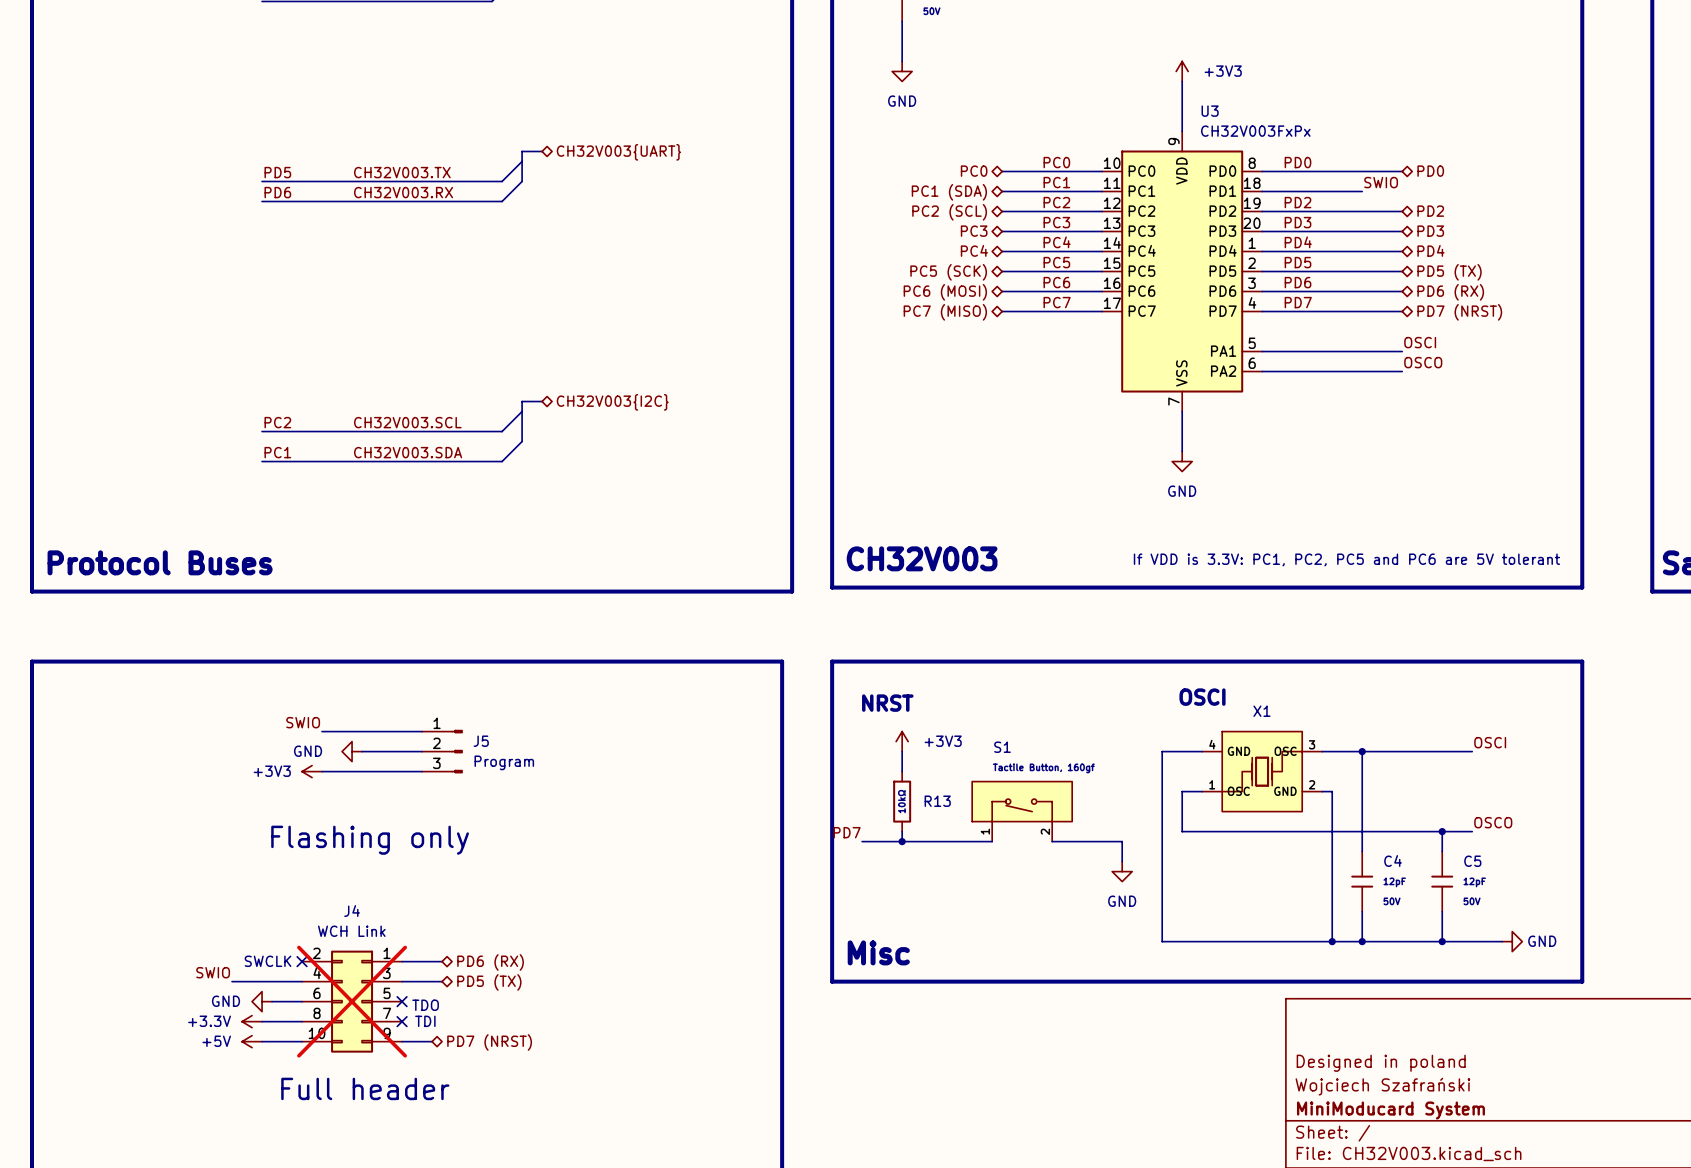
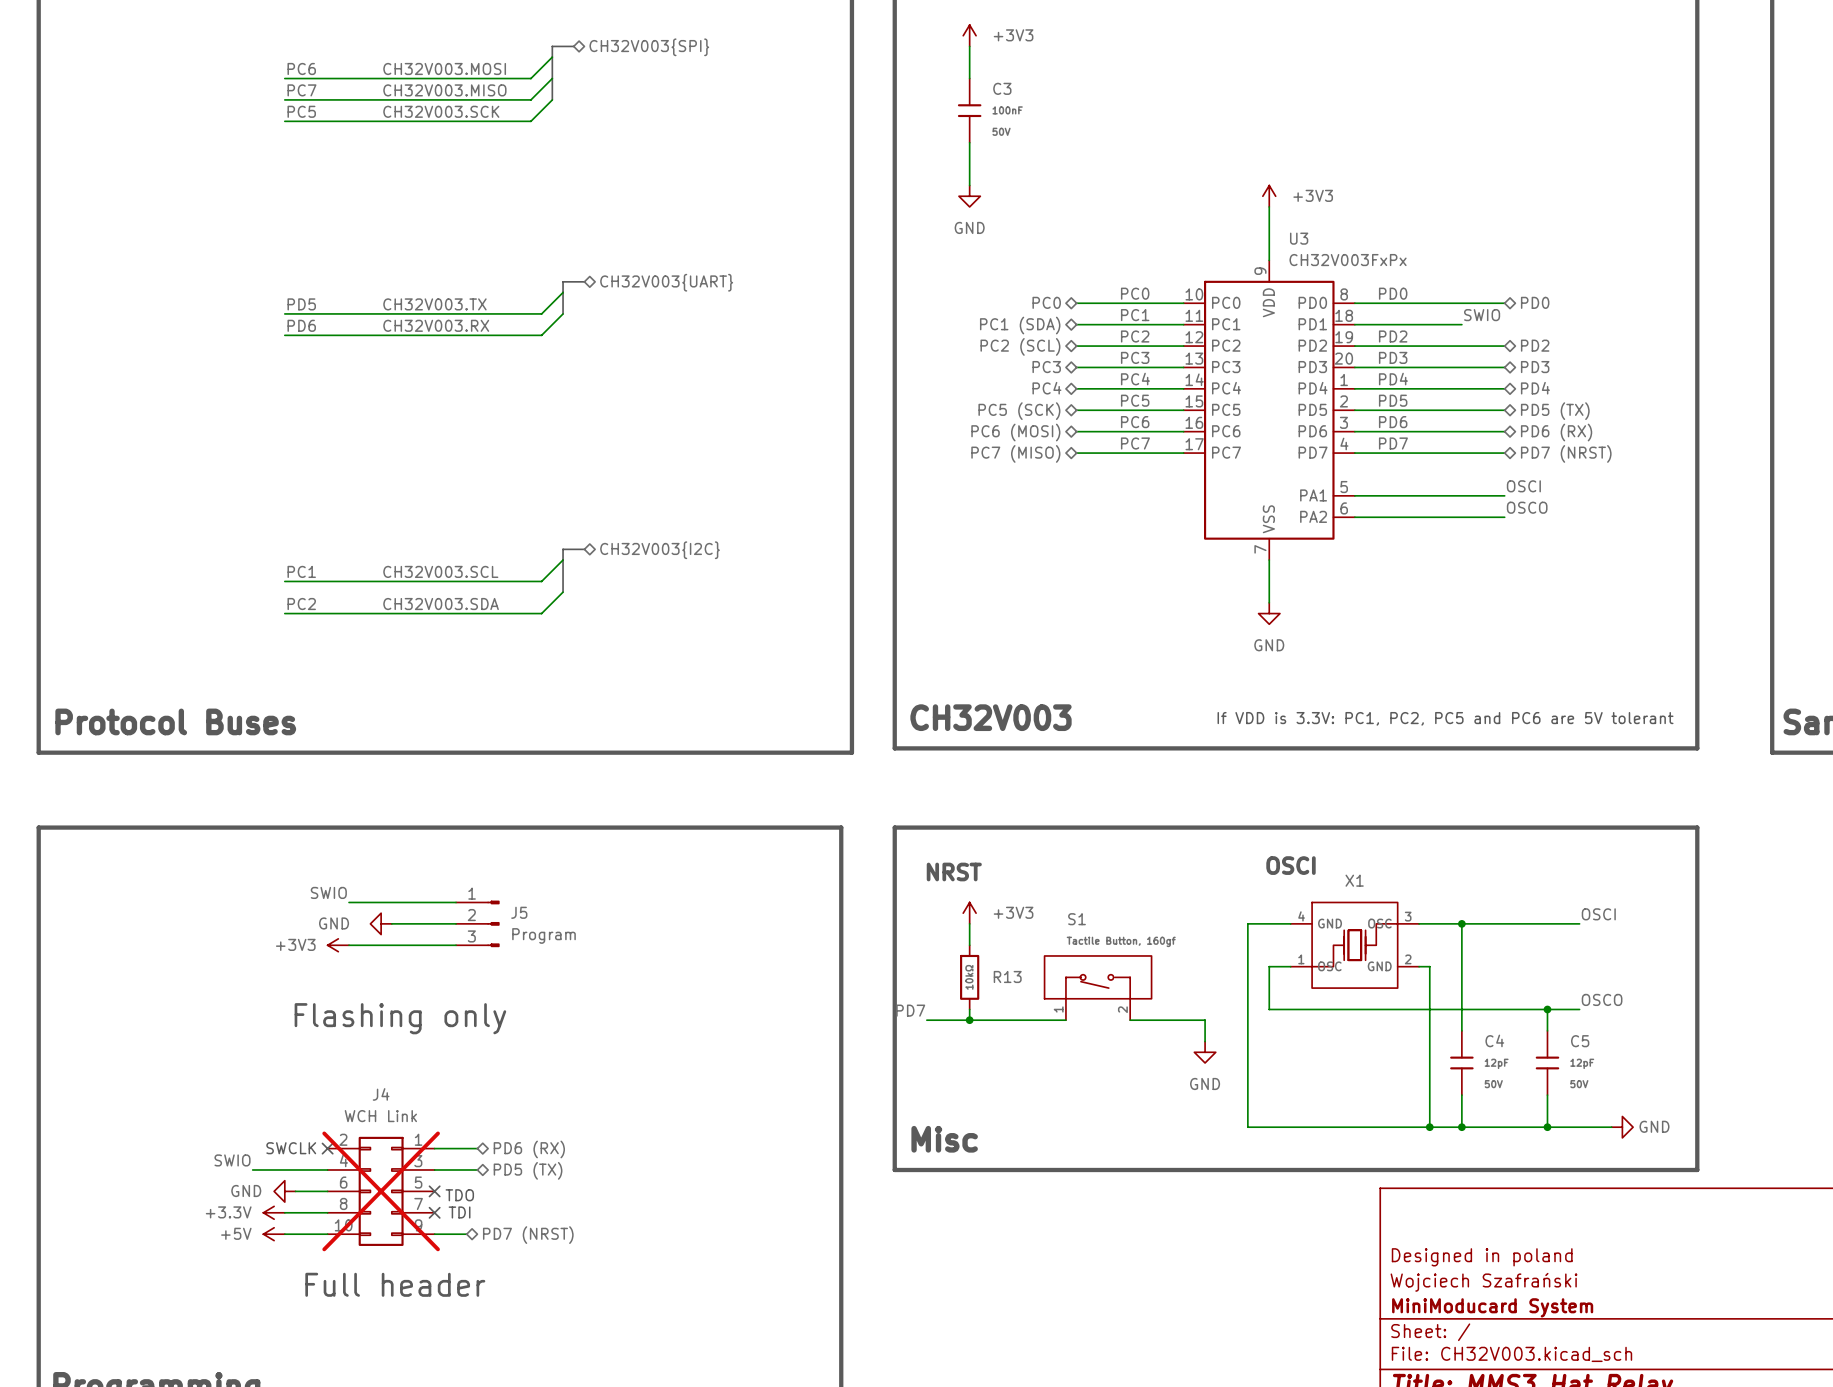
label: PC2 (277, 422) -> PC1 (301, 571)
label: PC1 (277, 452) -> PC2 (301, 604)

